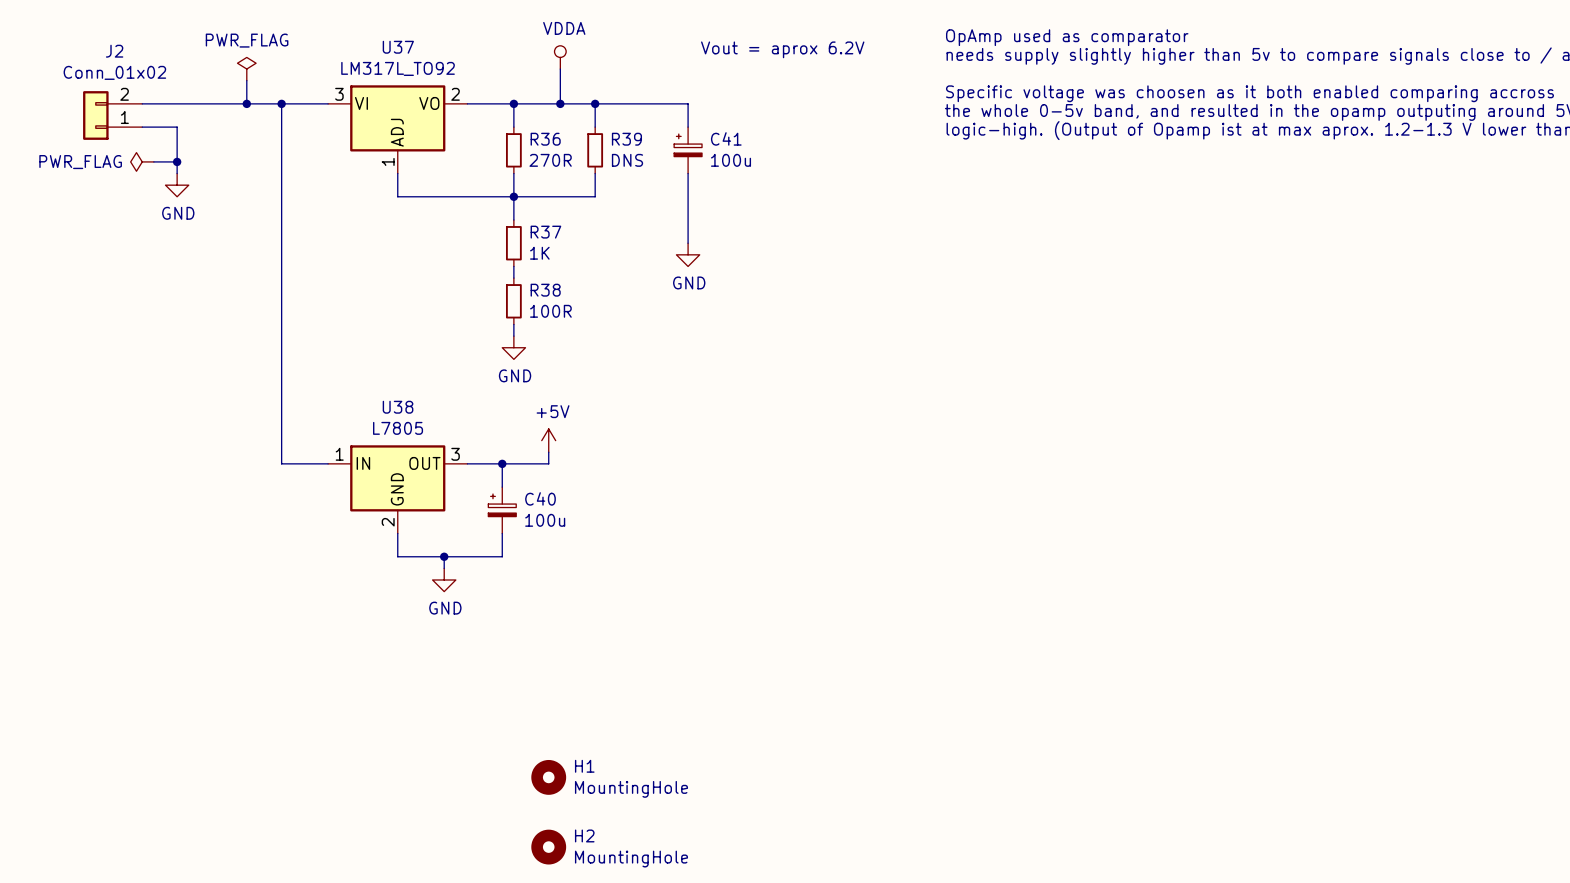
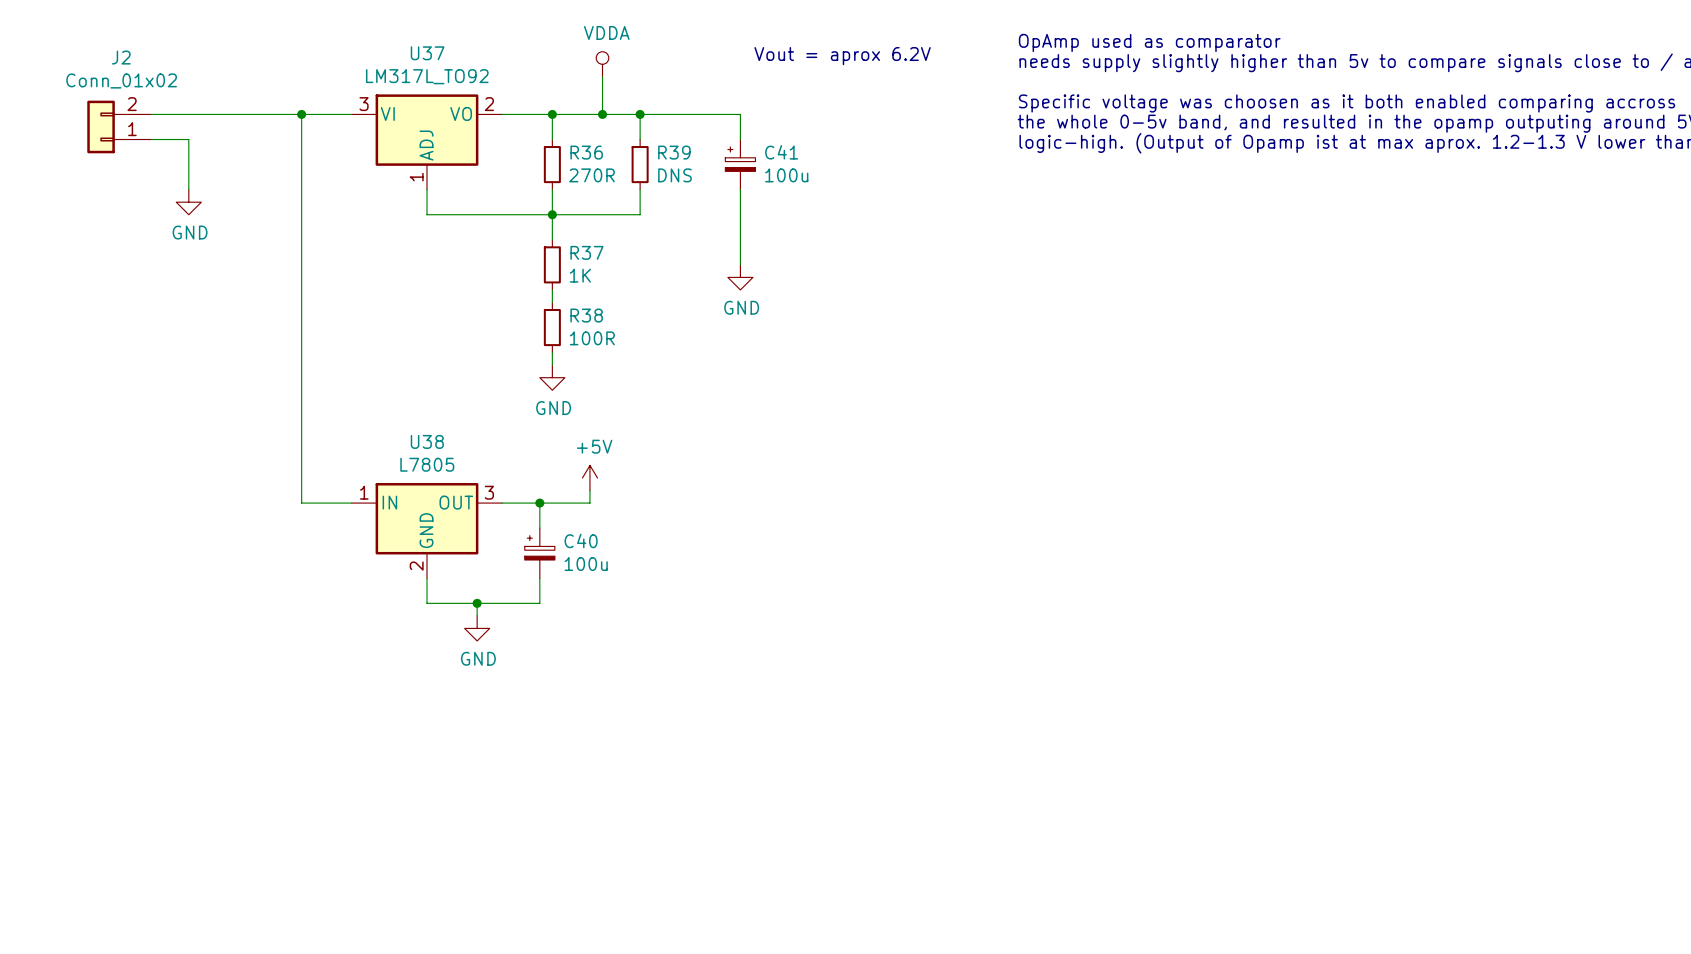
power symbol: PWR_FLAG (246, 69) -> none
wire: (246, 80) (246, 103) -> none
junction: (246, 103) -> none
power symbol: PWR_FLAG (142, 161) -> none
wire: (153, 161) (177, 161) -> none
junction: (177, 161) -> none
H1: MountingHole (548, 777) -> none
H2: MountingHole (548, 847) -> none

